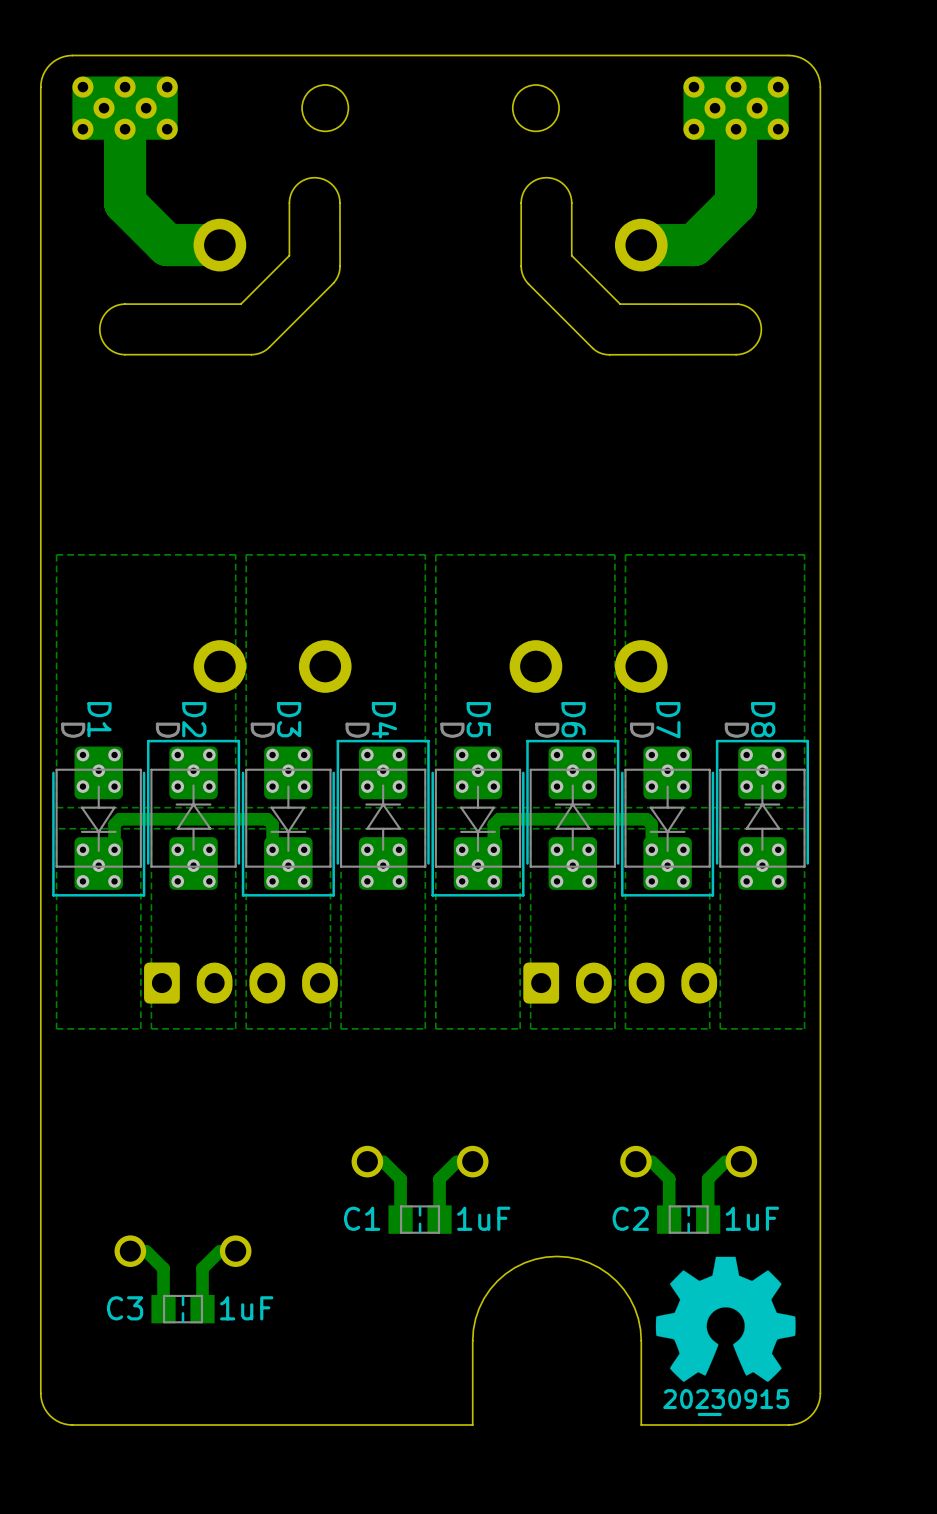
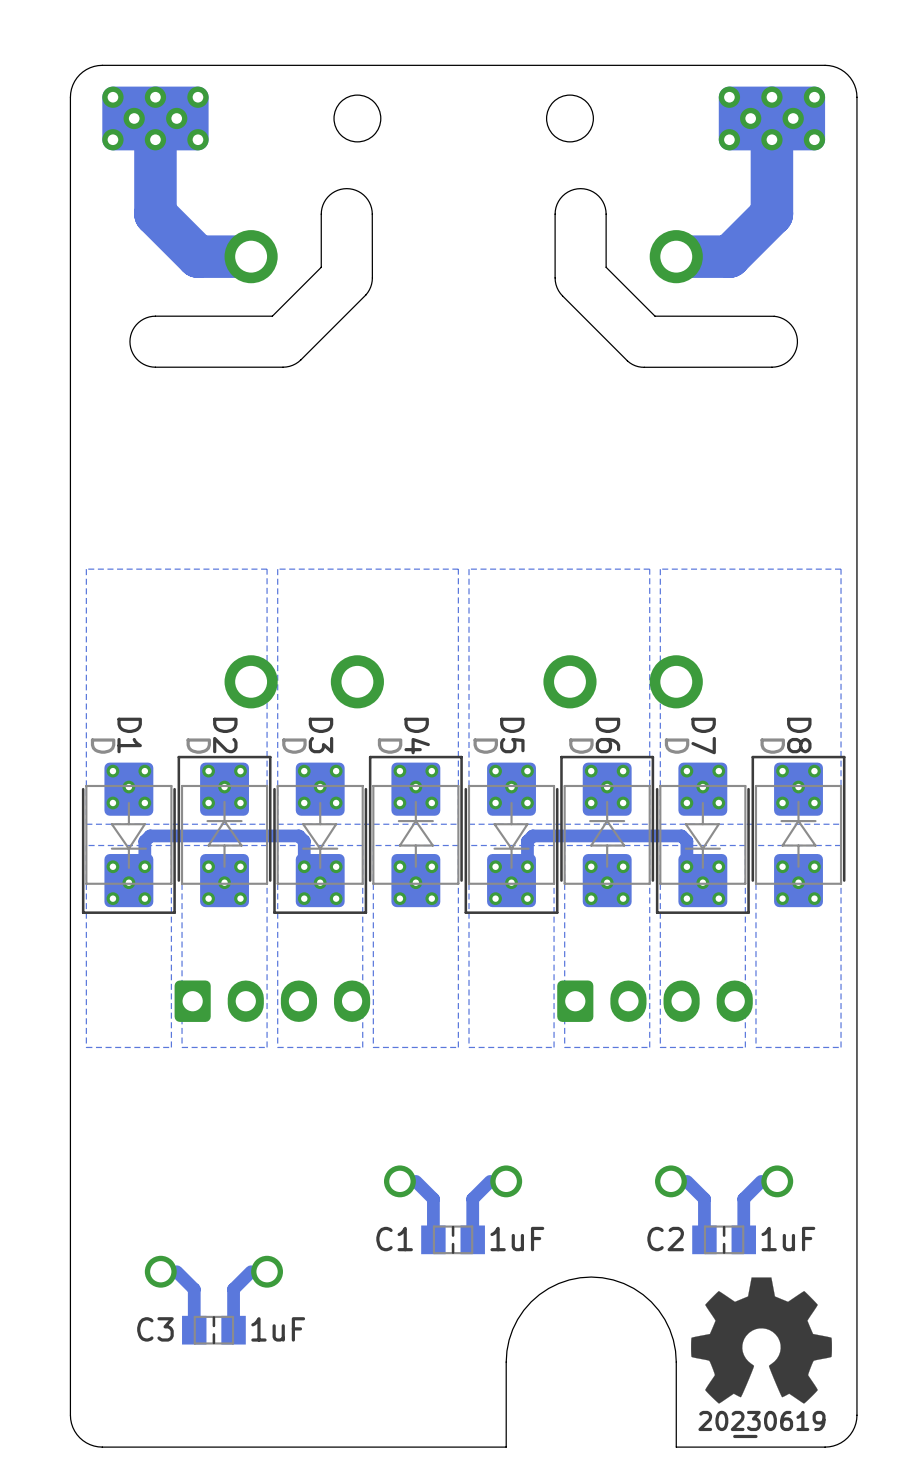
drawing shape: [663, 1389, 790, 1417] -> [698, 1410, 826, 1439]

